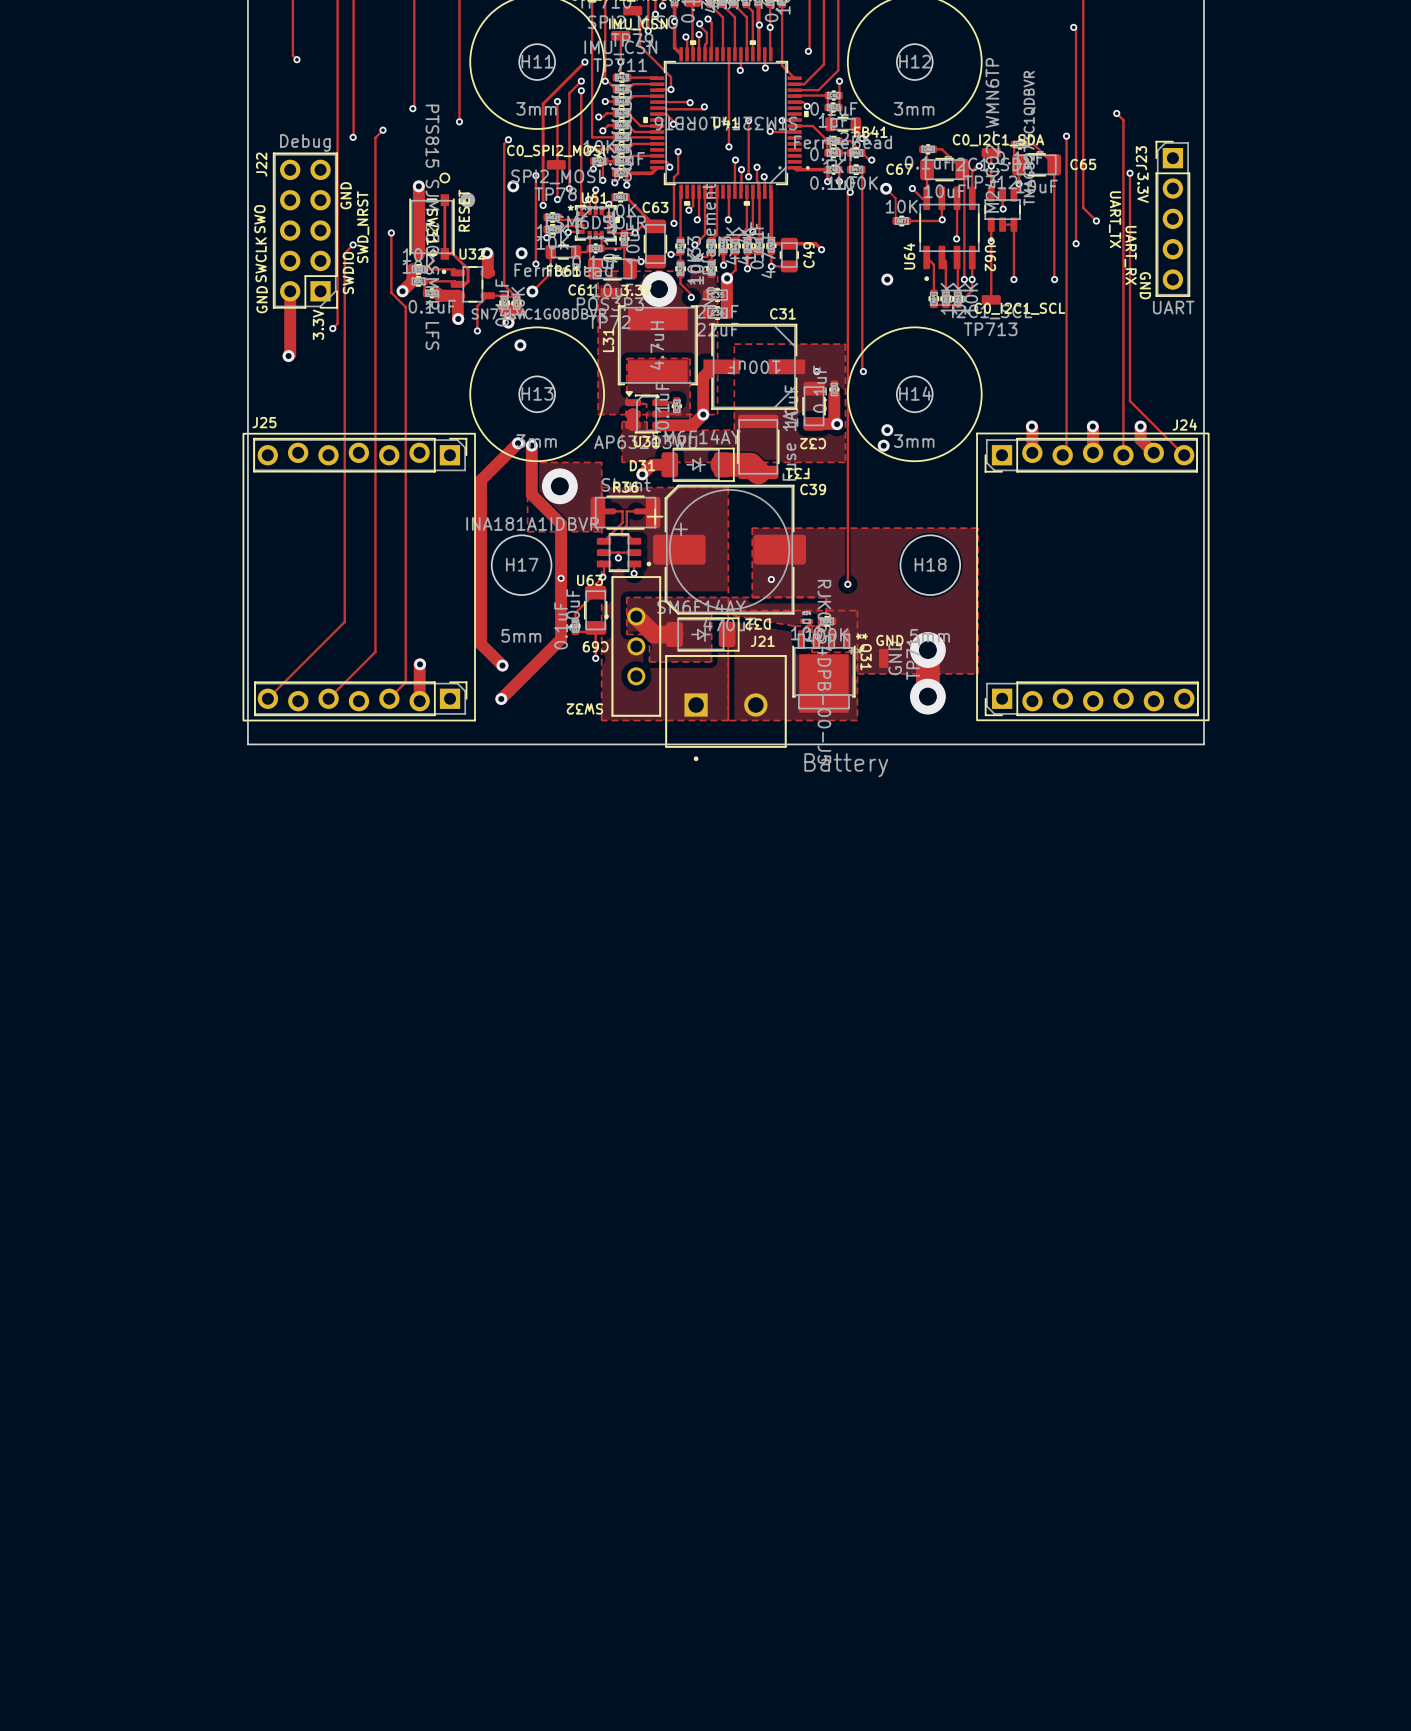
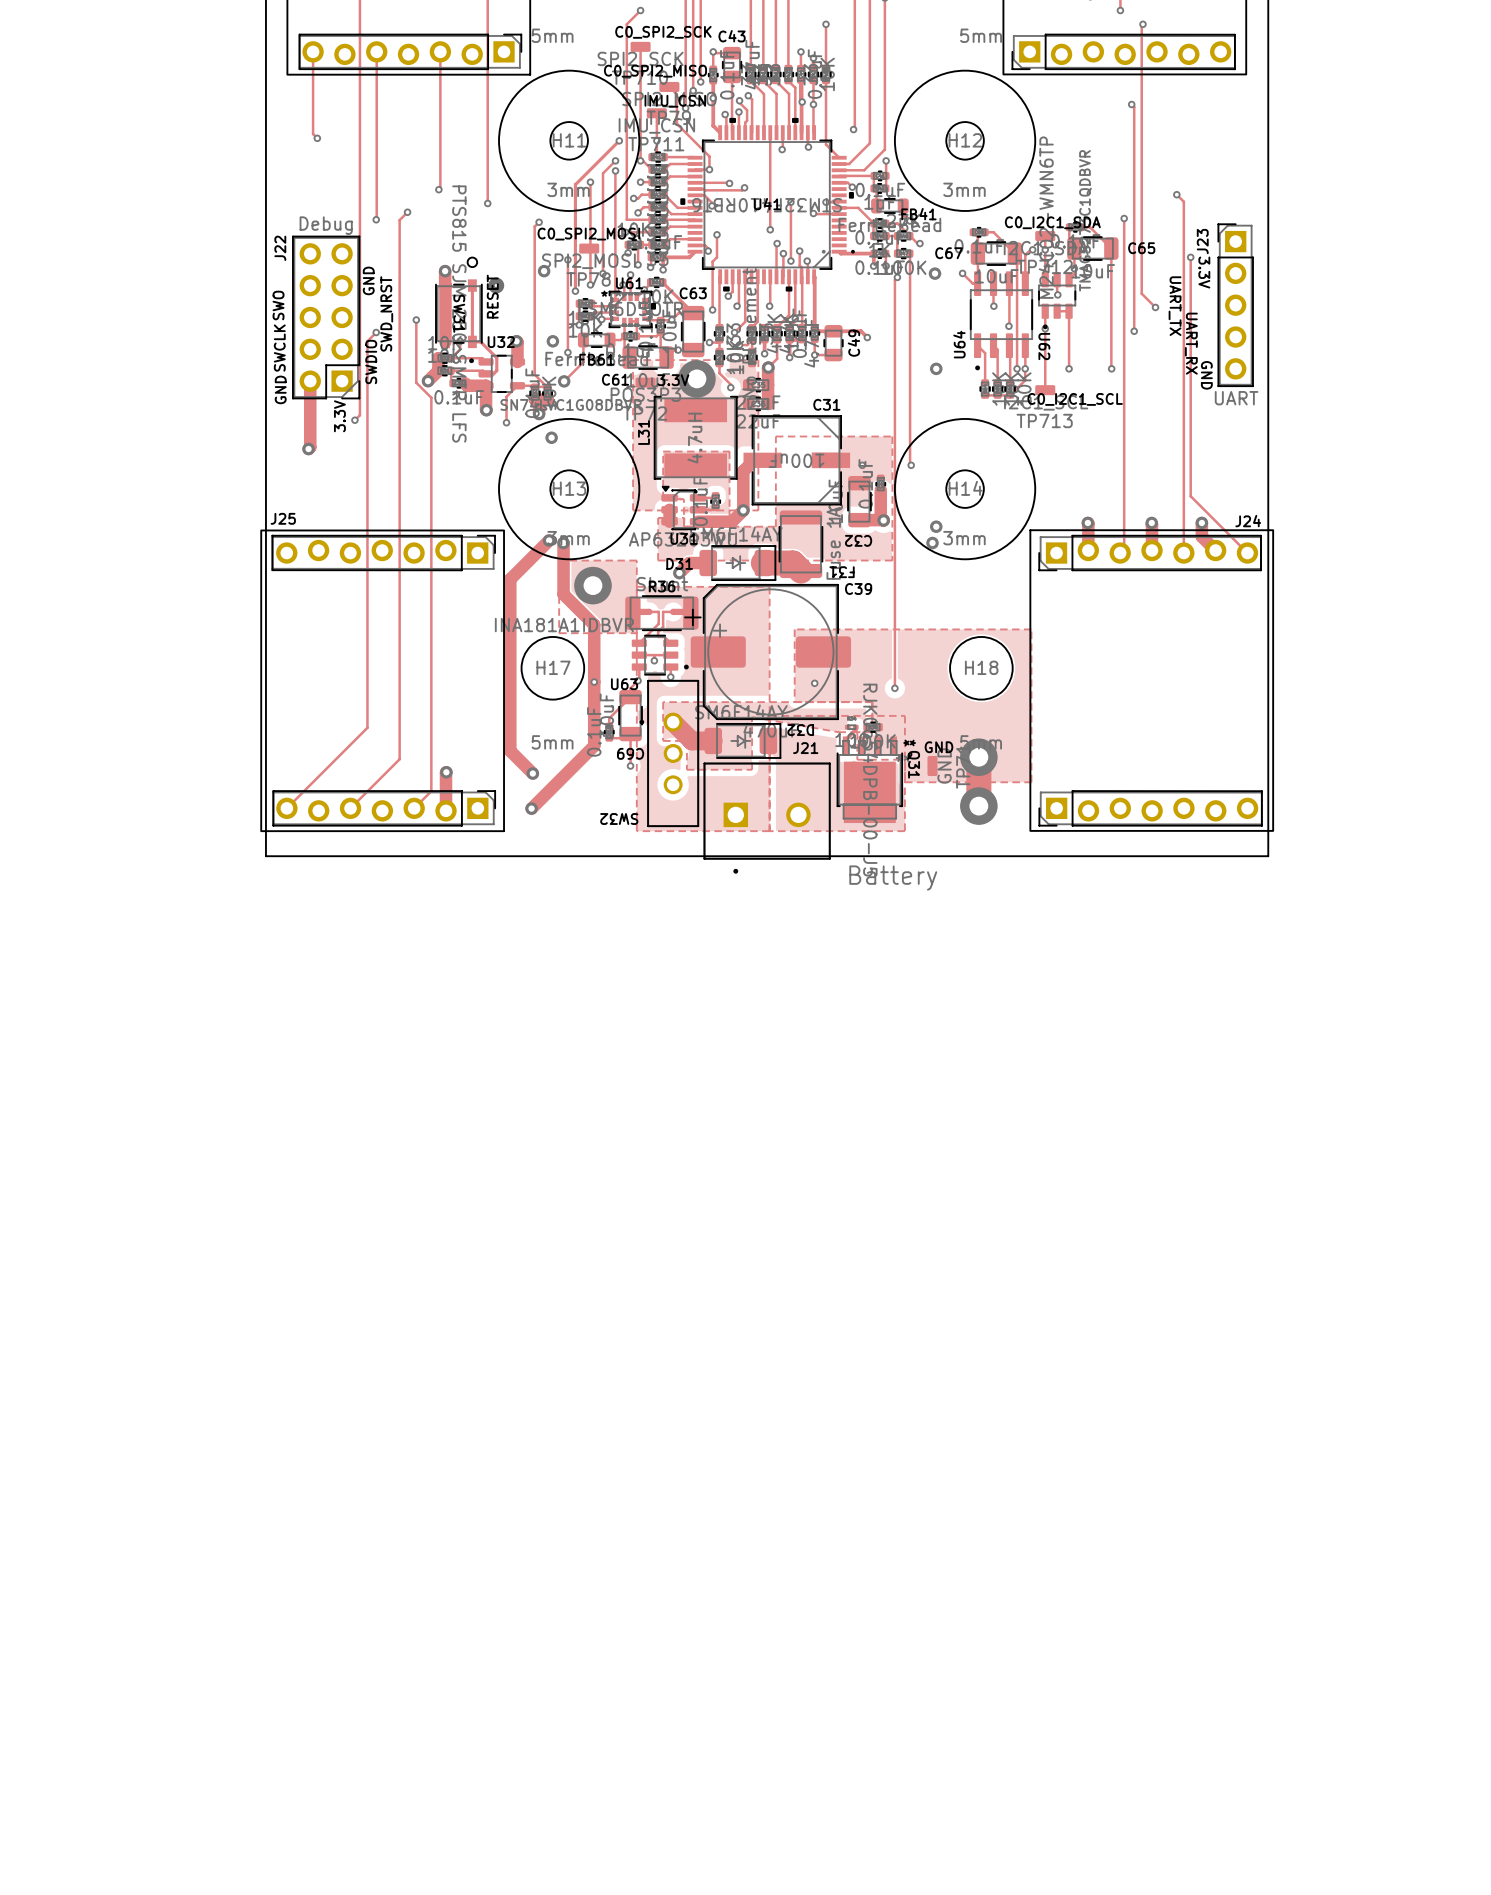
track: (886, 188) (895, 198) (895, 221) -> none
track: (942, 219) (907, 221) -> none
part: 10K (901, 221) -> none

